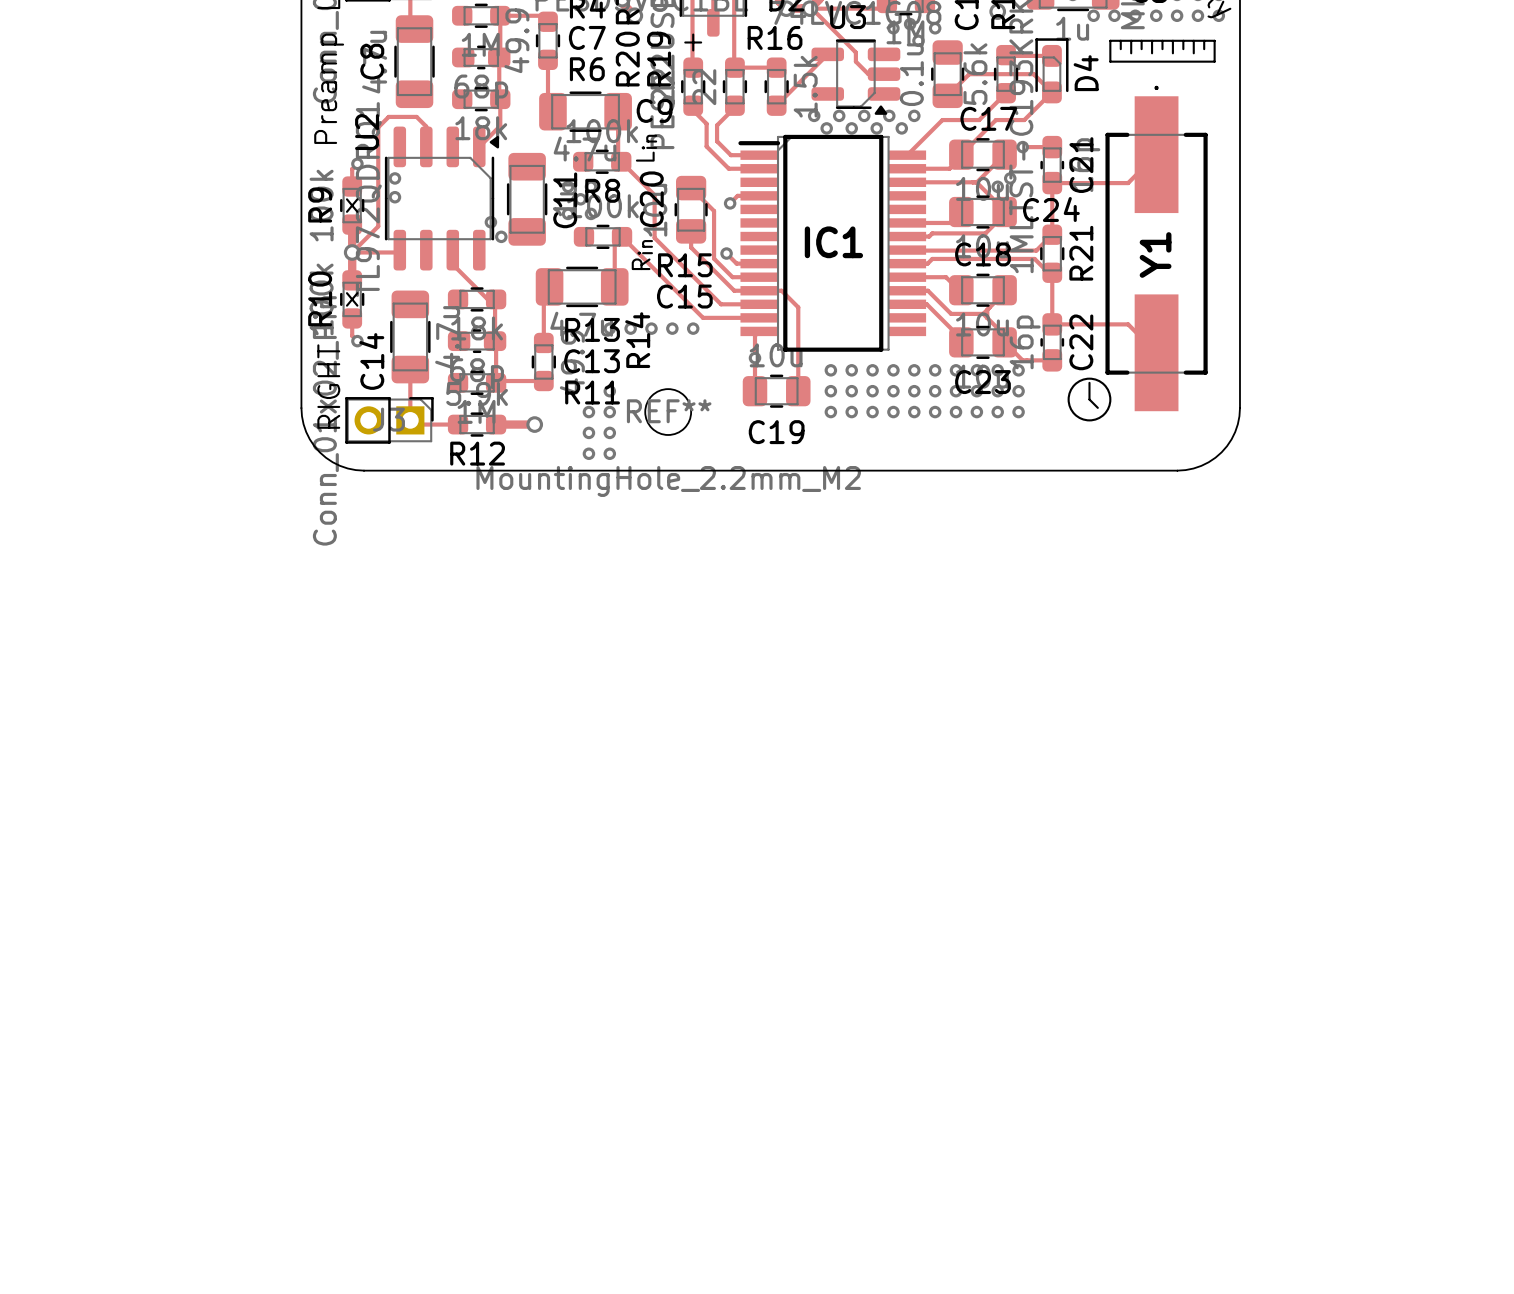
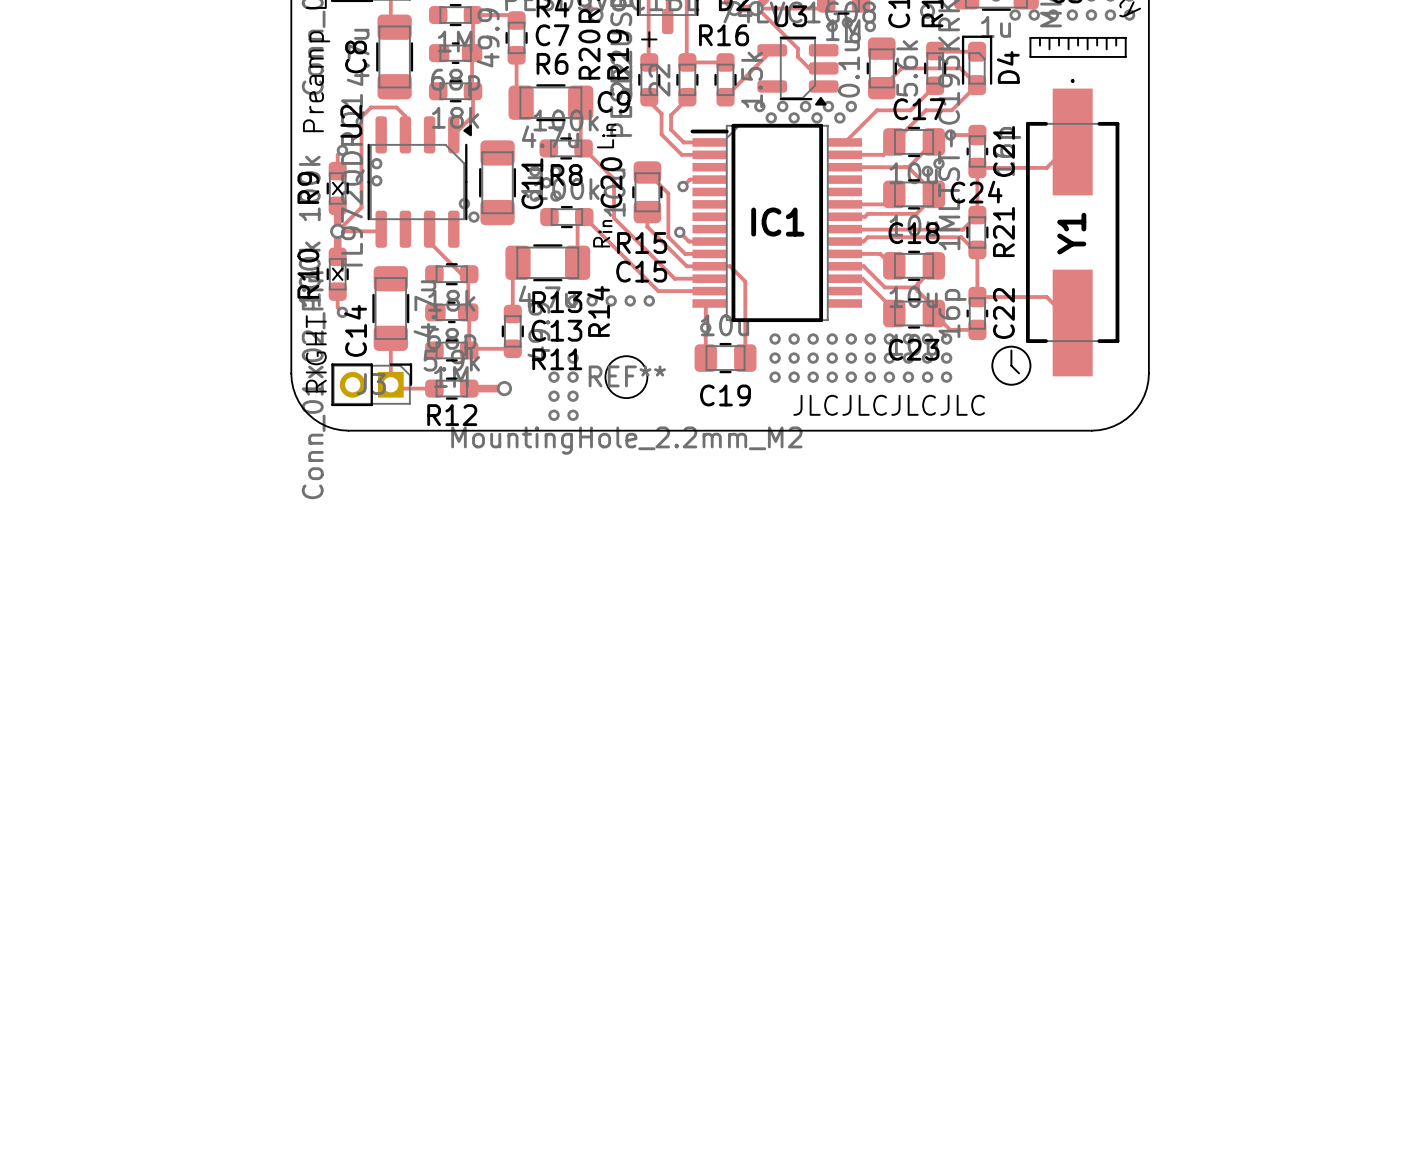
text: none -> JLCJLCJLCJLC (889, 405)

